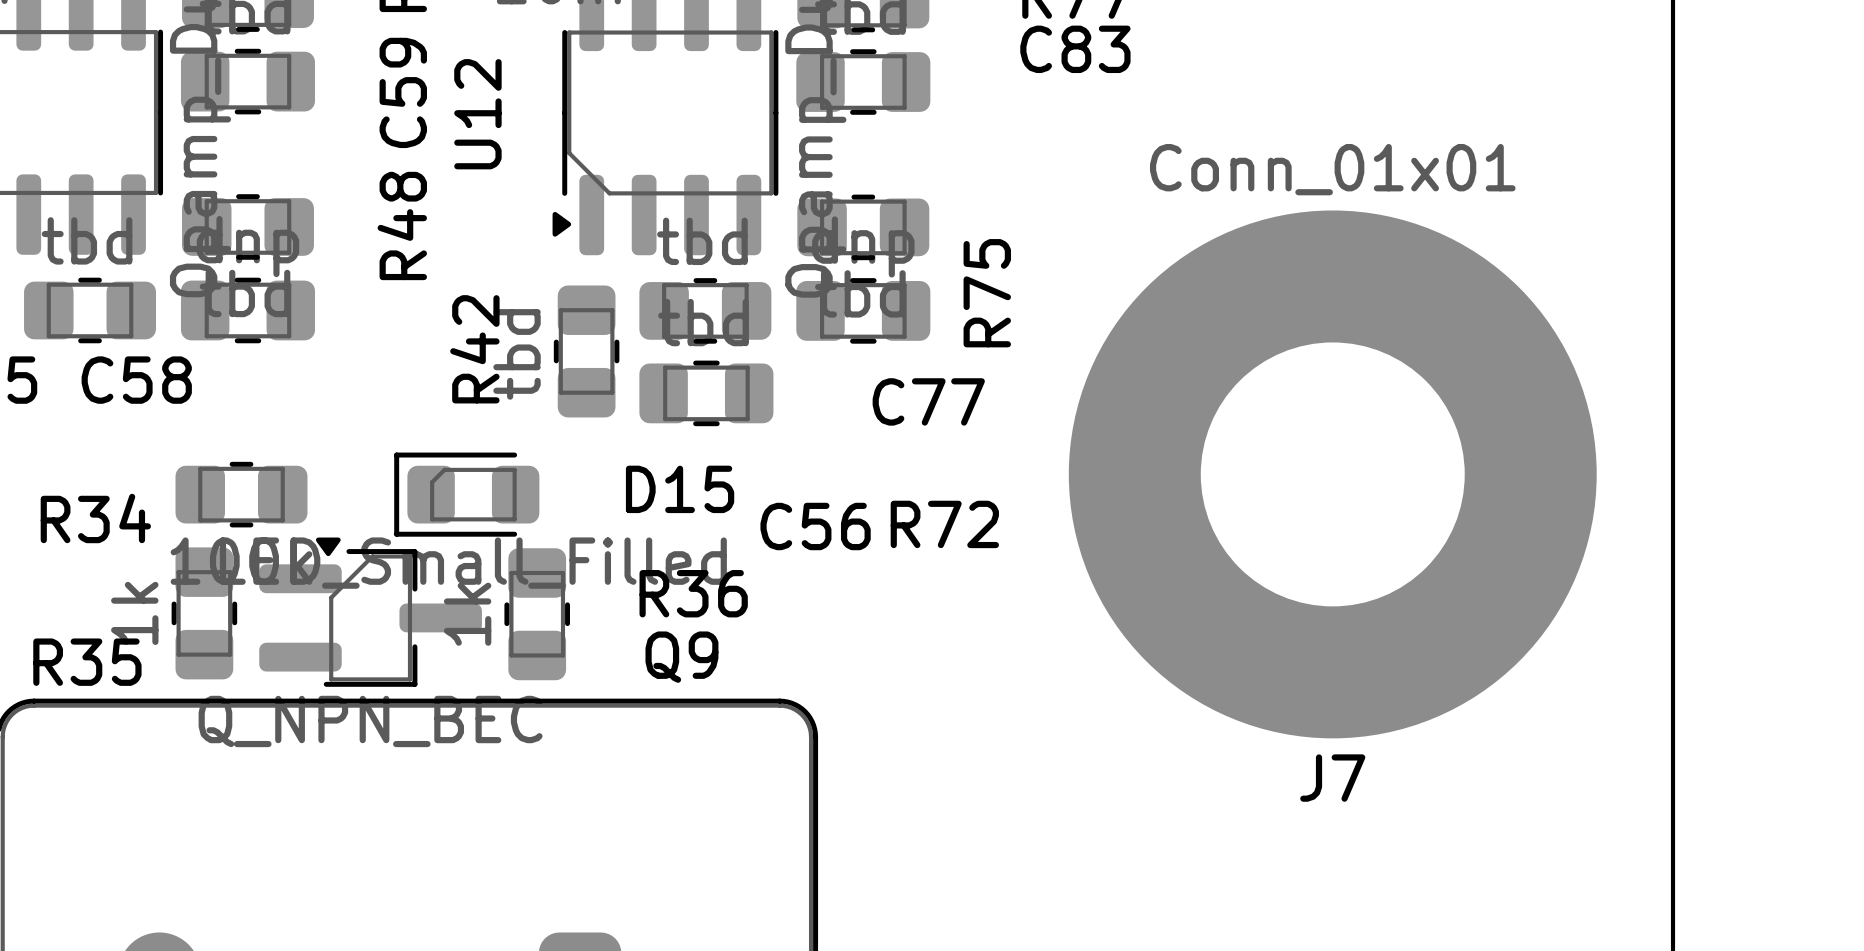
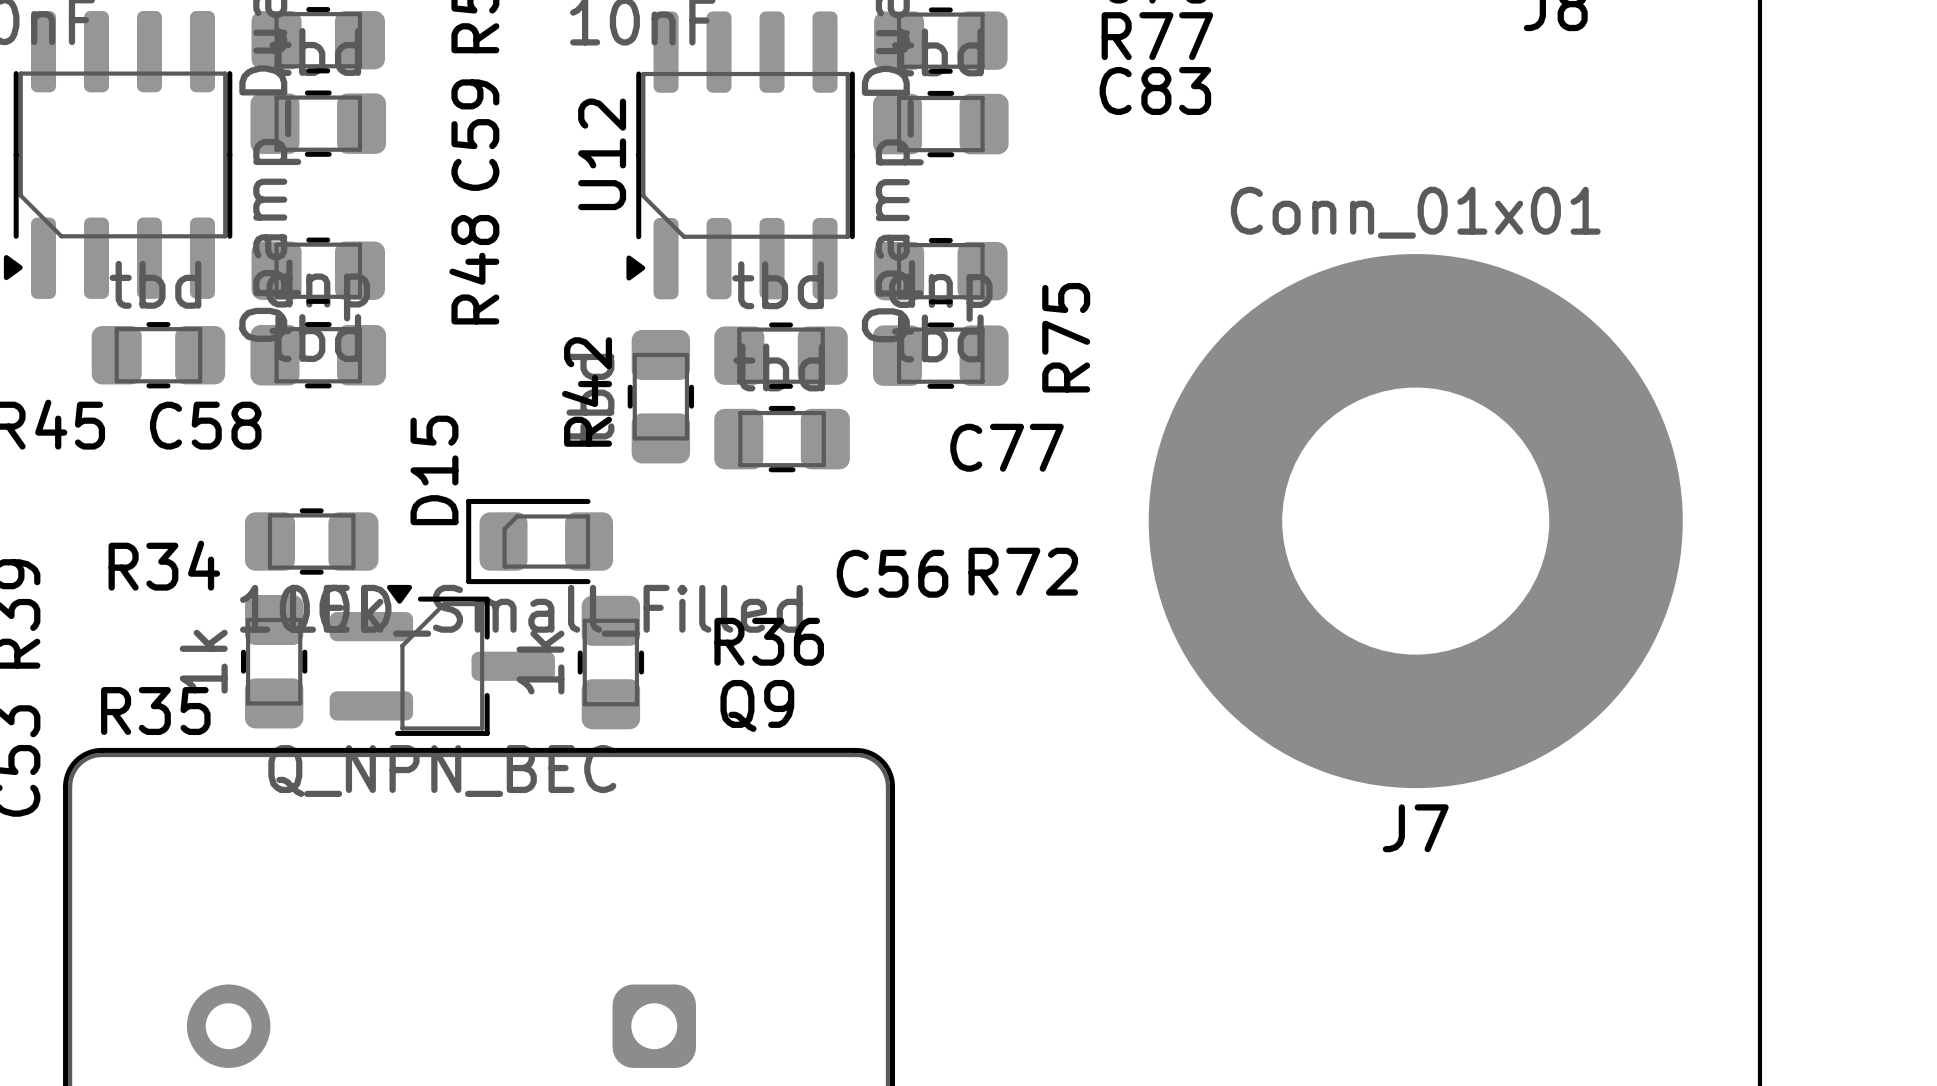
U12 name position: U12 (477, 114) -> U12 (602, 154)
R42 name position: R42 (474, 349) -> R42 (587, 391)
D15 name rotation: 0° (680, 489) -> 90° counterclockwise (434, 470)
D15 name position: D15 (680, 489) -> D15 (434, 470)

